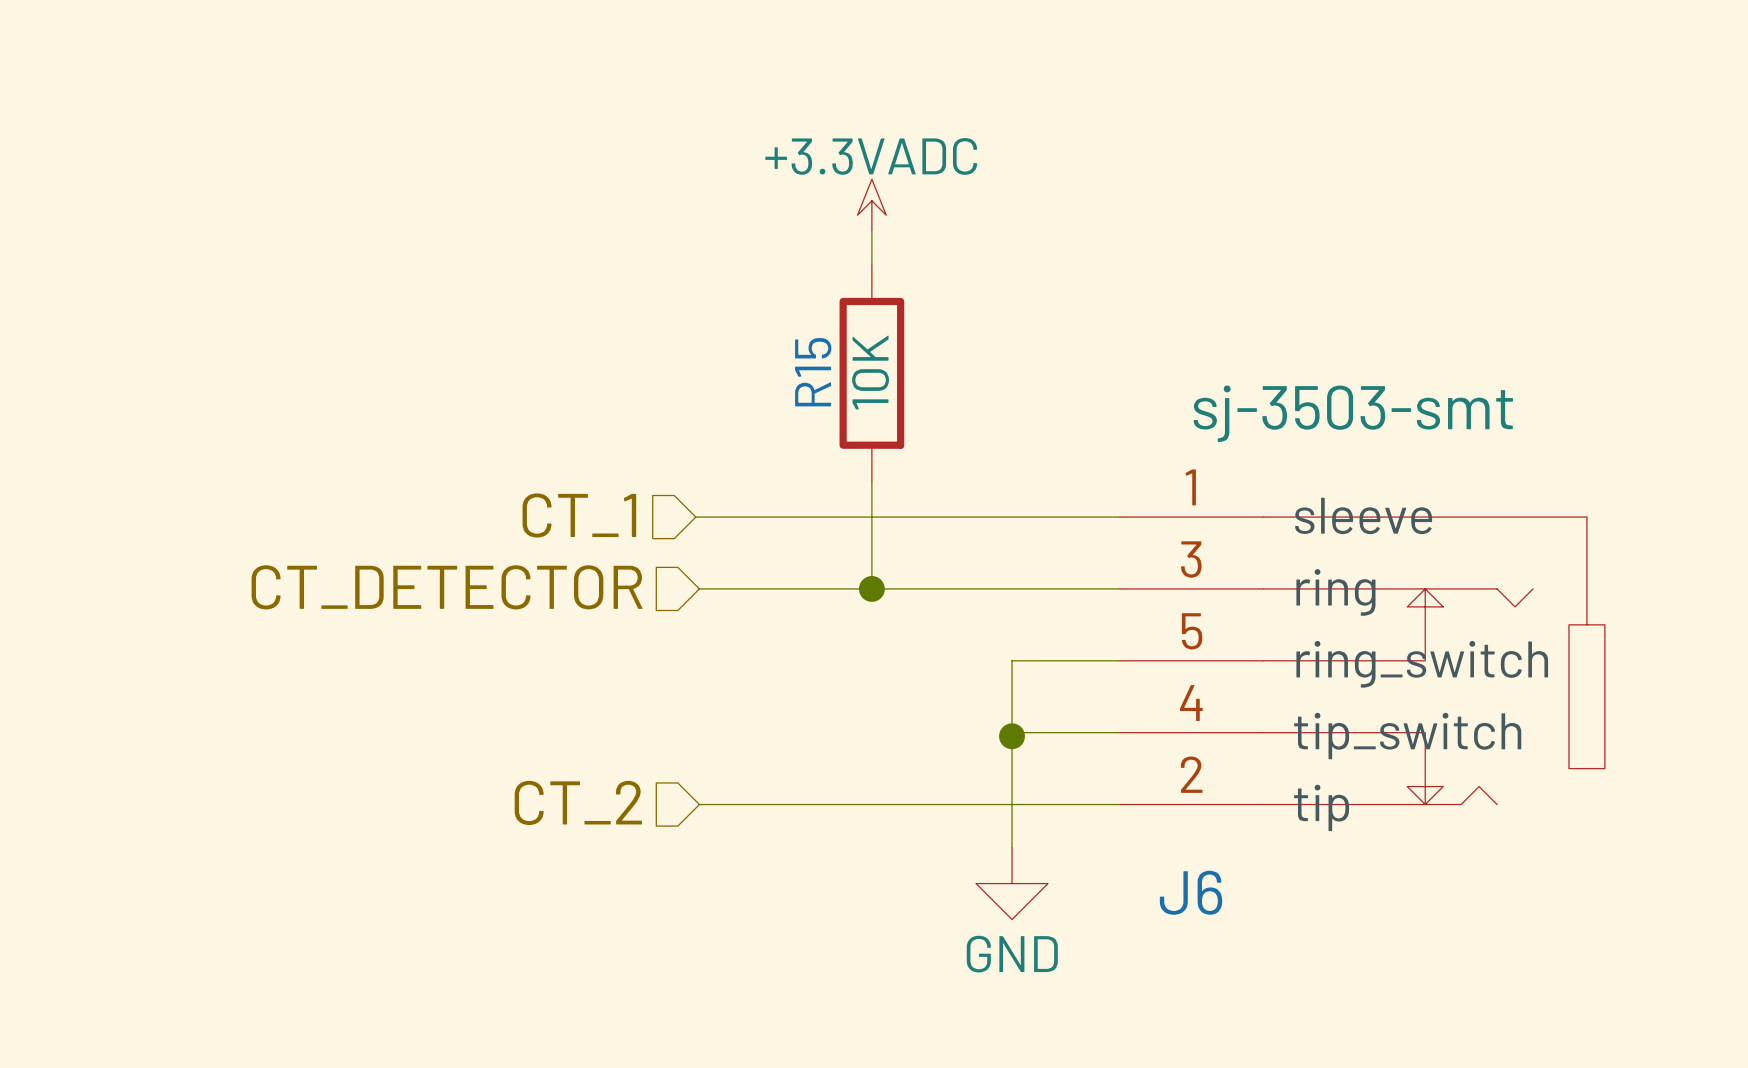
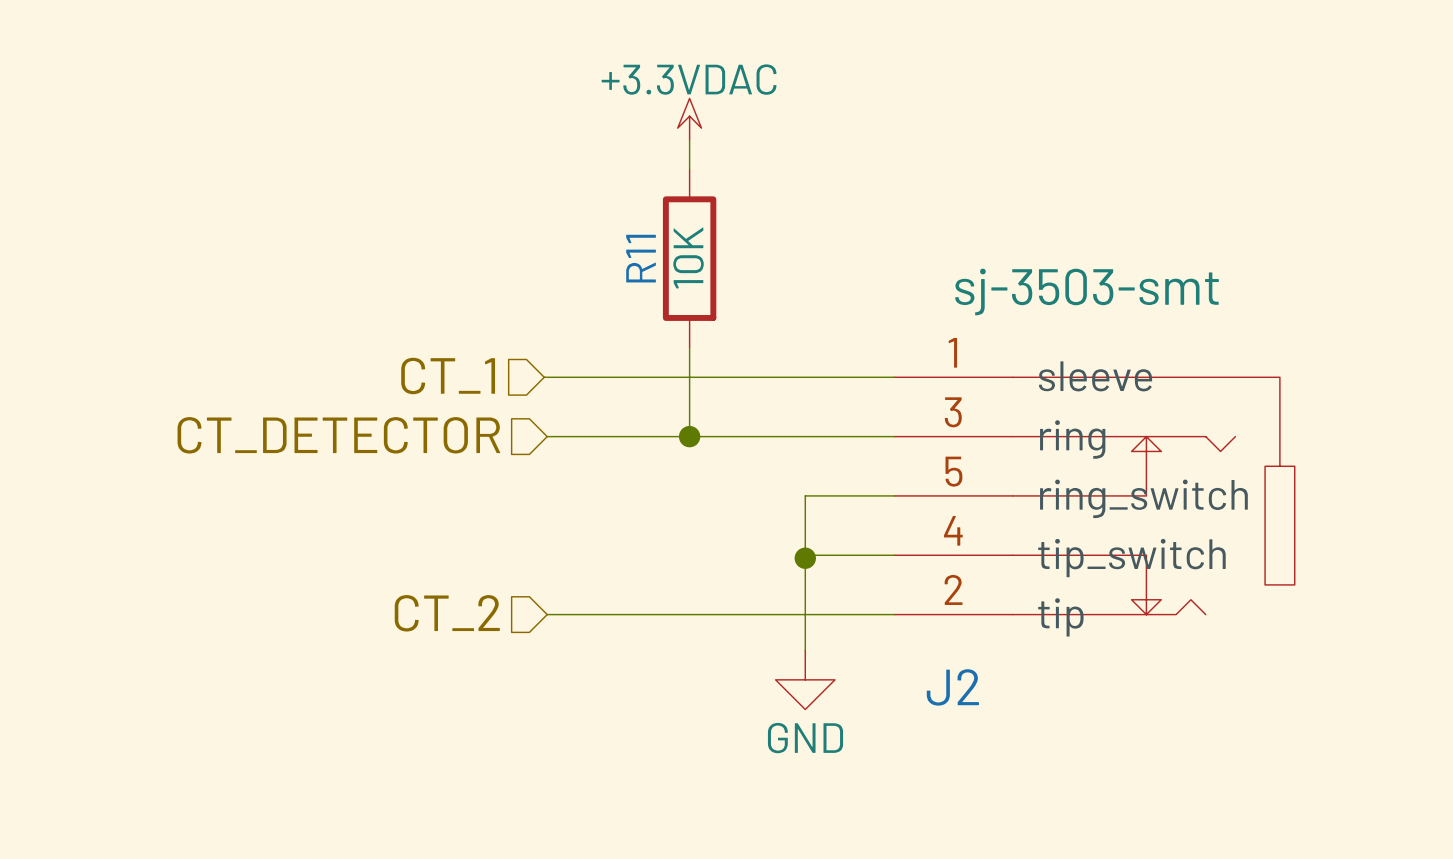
power symbol: +3.3VADC (871, 204) -> +3.3VDAC (689, 119)
R15 name: R15 (813, 372) -> R11 (641, 258)
J6 name: J6 (1191, 892) -> J2 (952, 687)

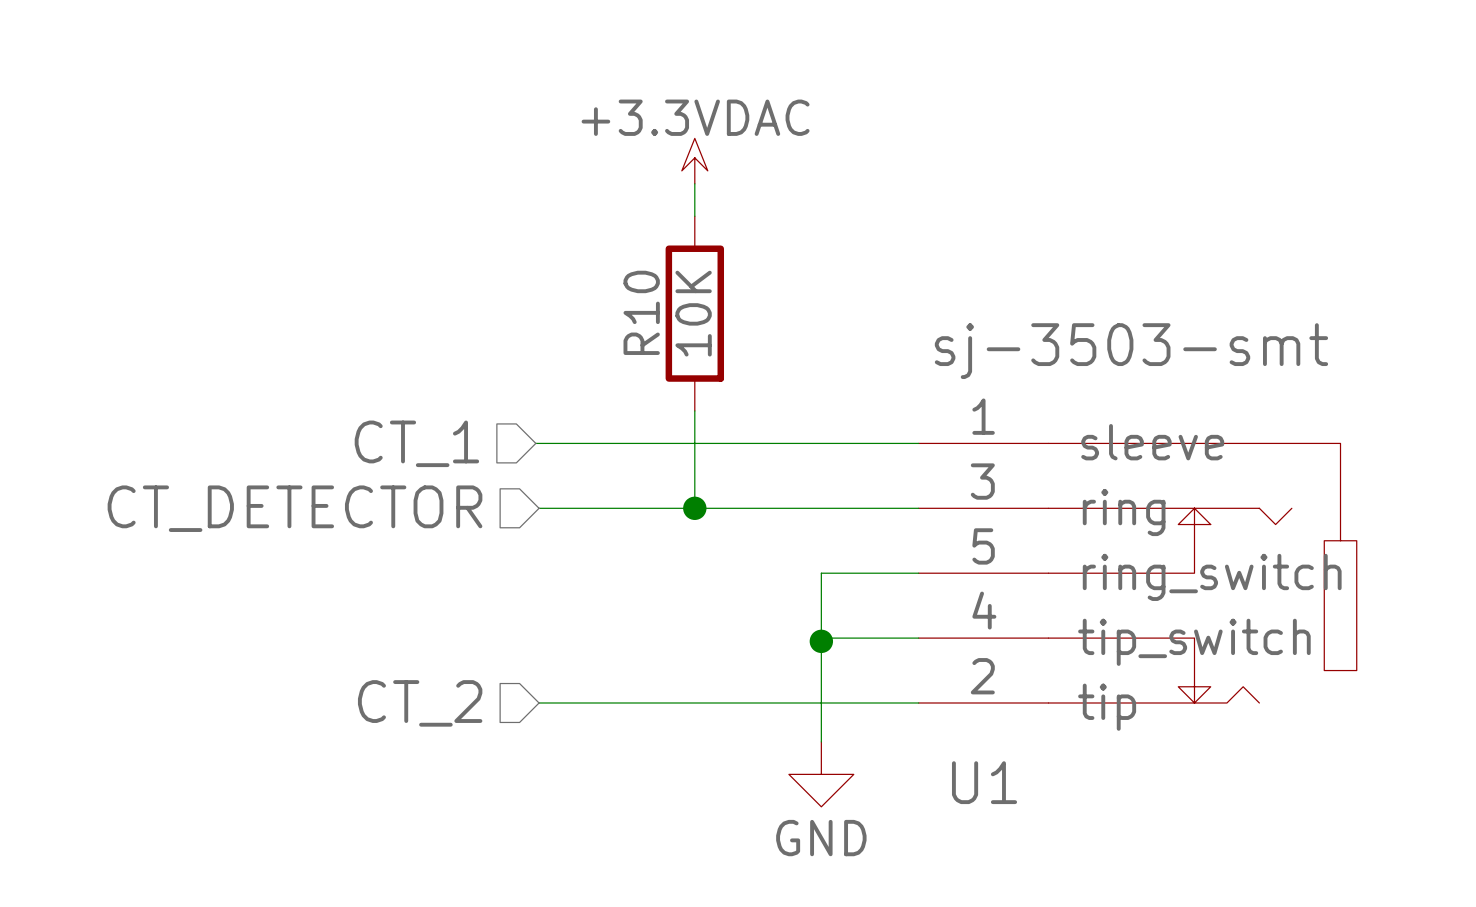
R11 name: R11 (641, 258) -> R10 (641, 312)
J2 name: J2 (952, 687) -> U1 (984, 782)

